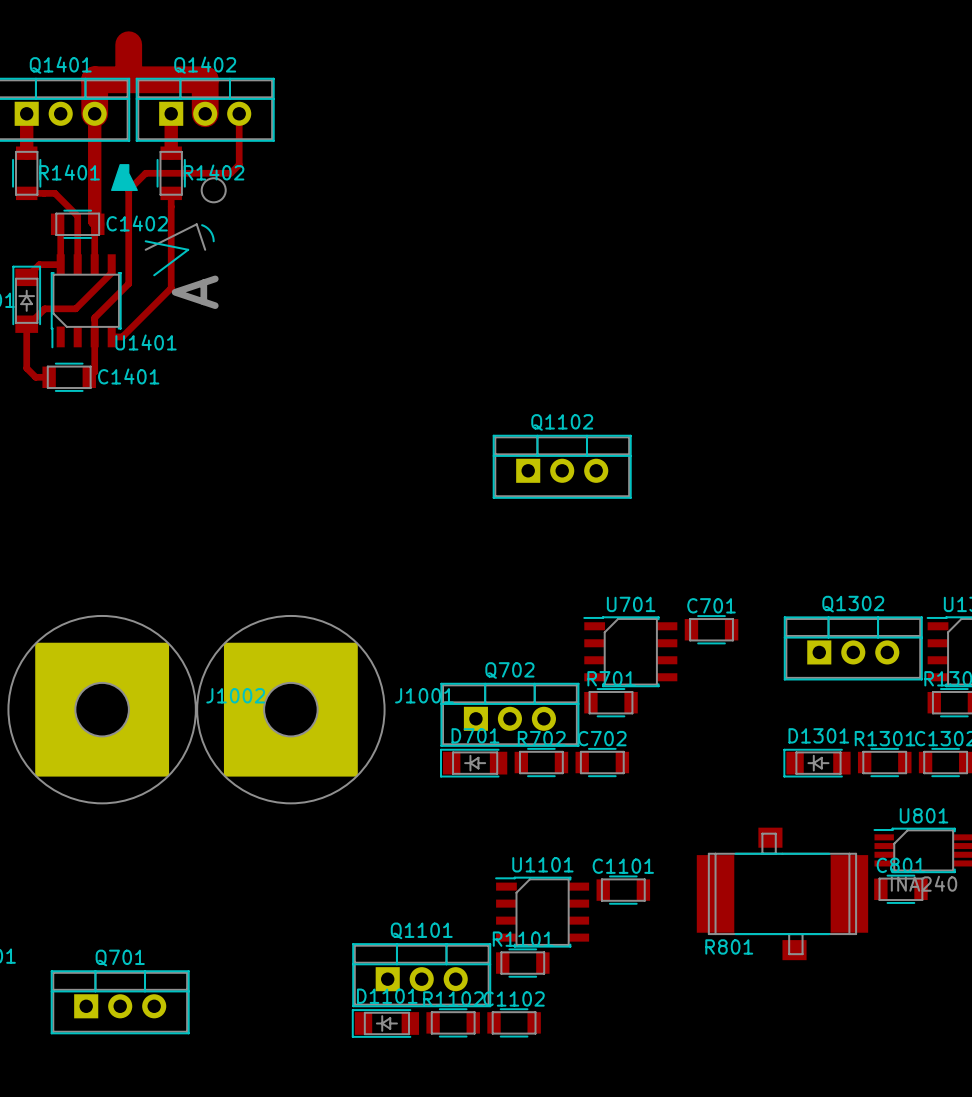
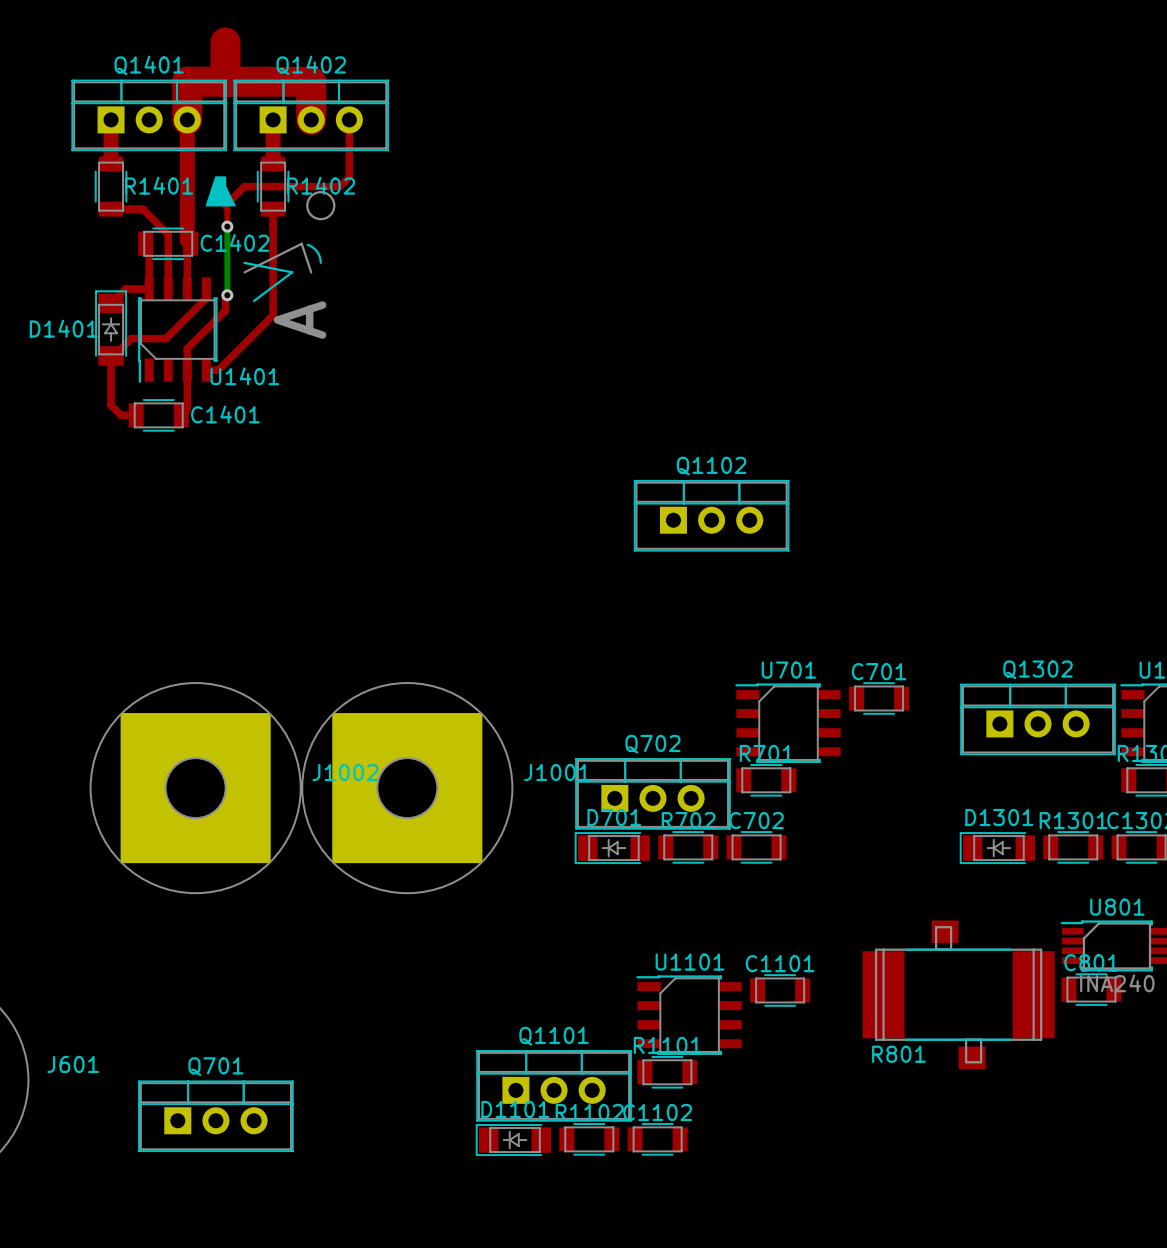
top track: (128, 190) (128, 271) -> (225, 205) (227, 207) (227, 226)
bottom track: none -> (227, 226) (227, 295)
via: none -> (227, 226)
via: none -> (227, 295)

